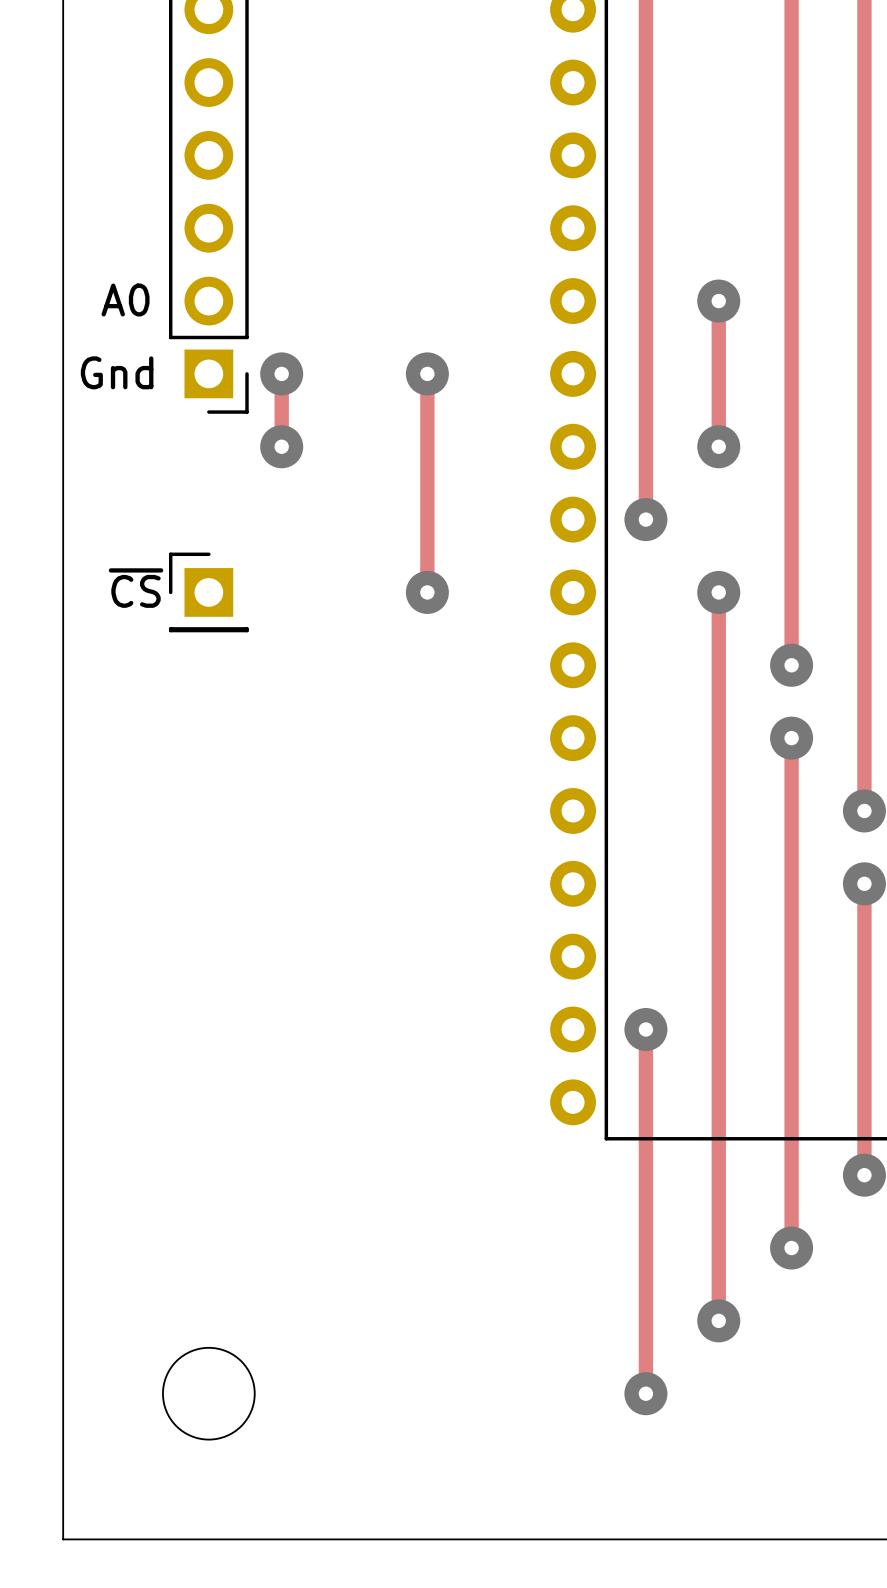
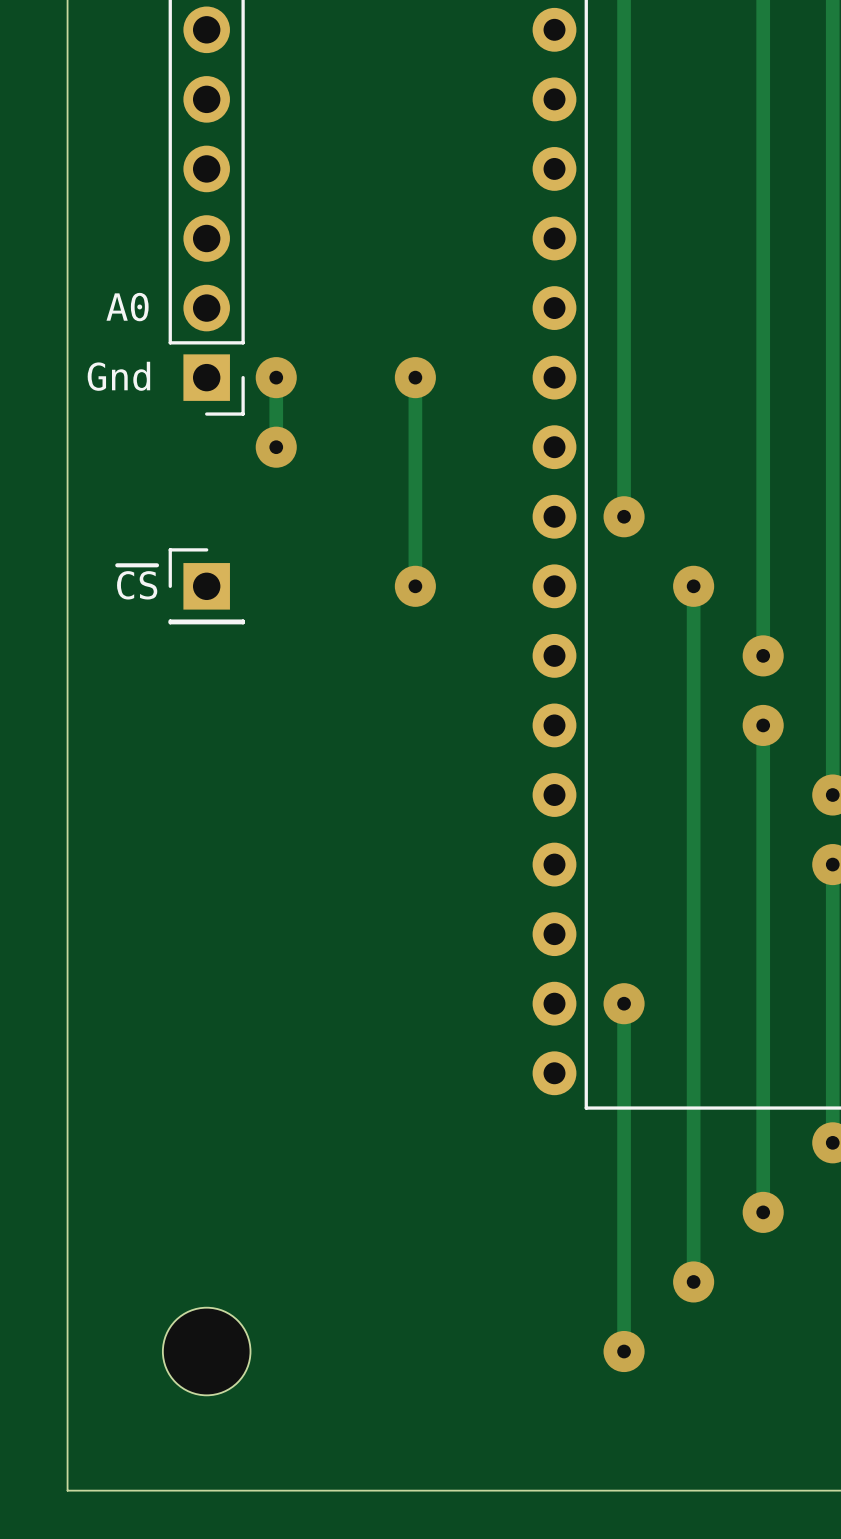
track: (718, 301) (718, 446) -> none
via: (718, 301) -> none
via: (718, 446) -> none

